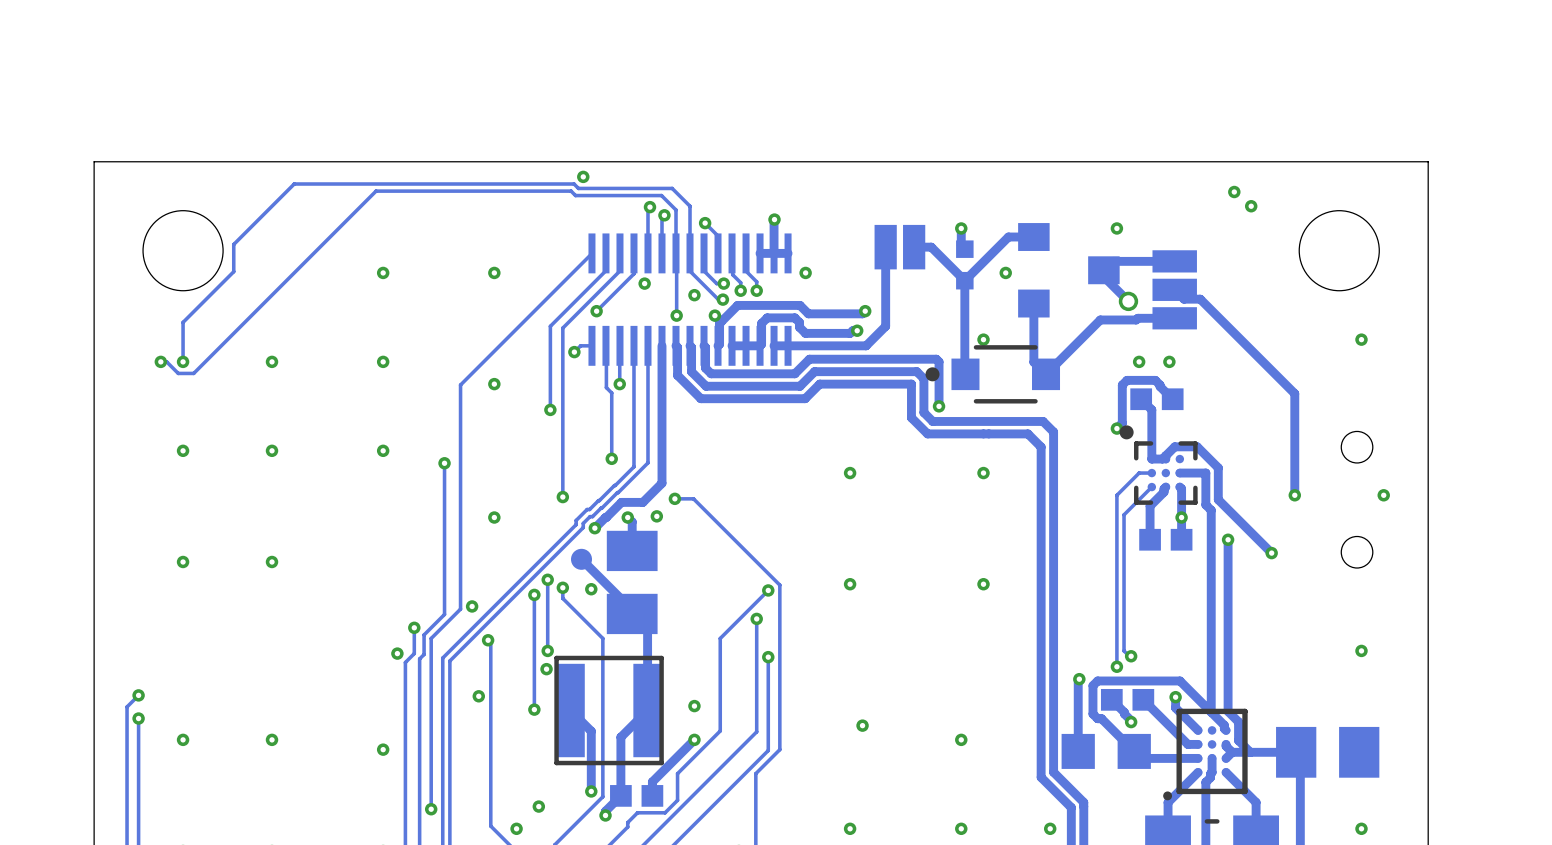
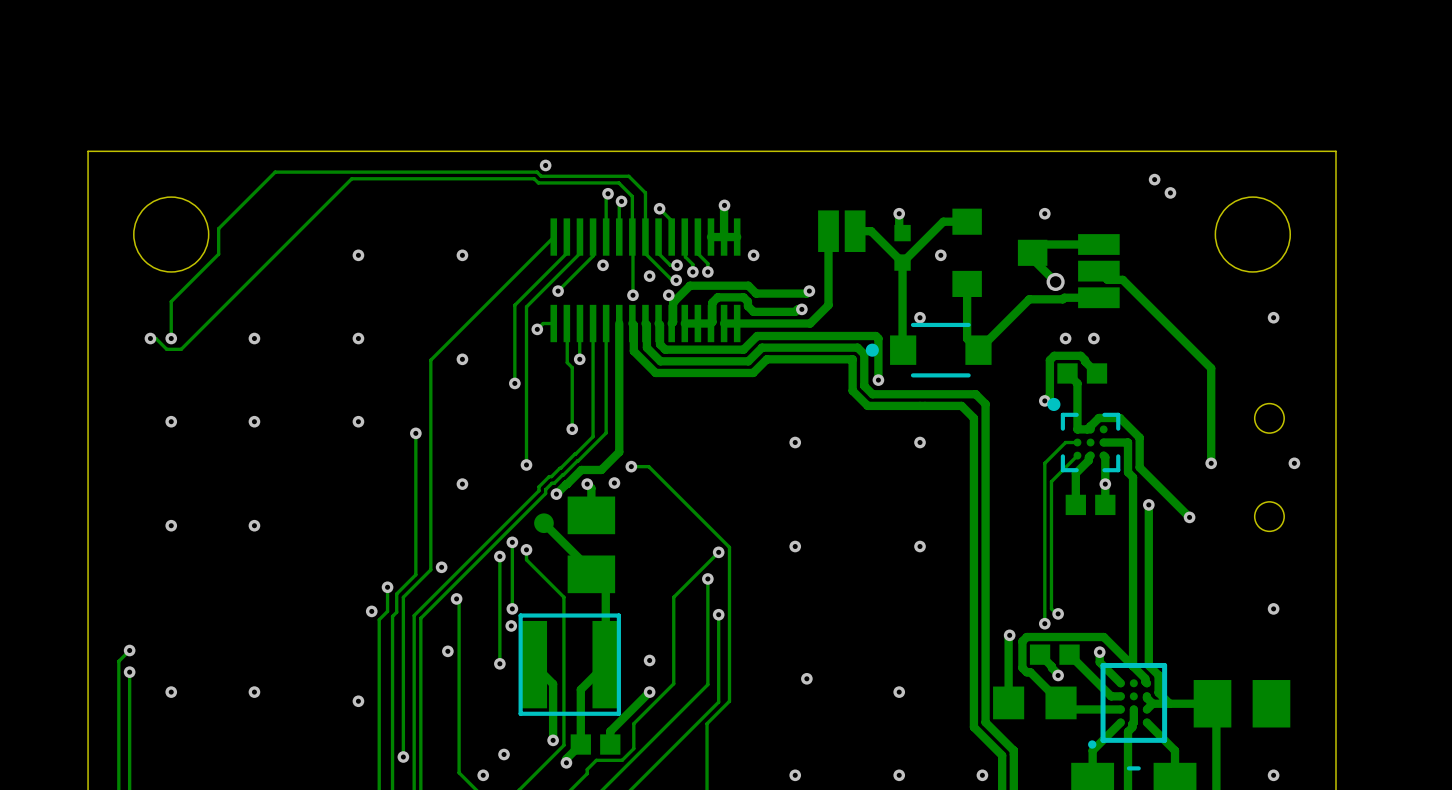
via: (591, 589) -> none

